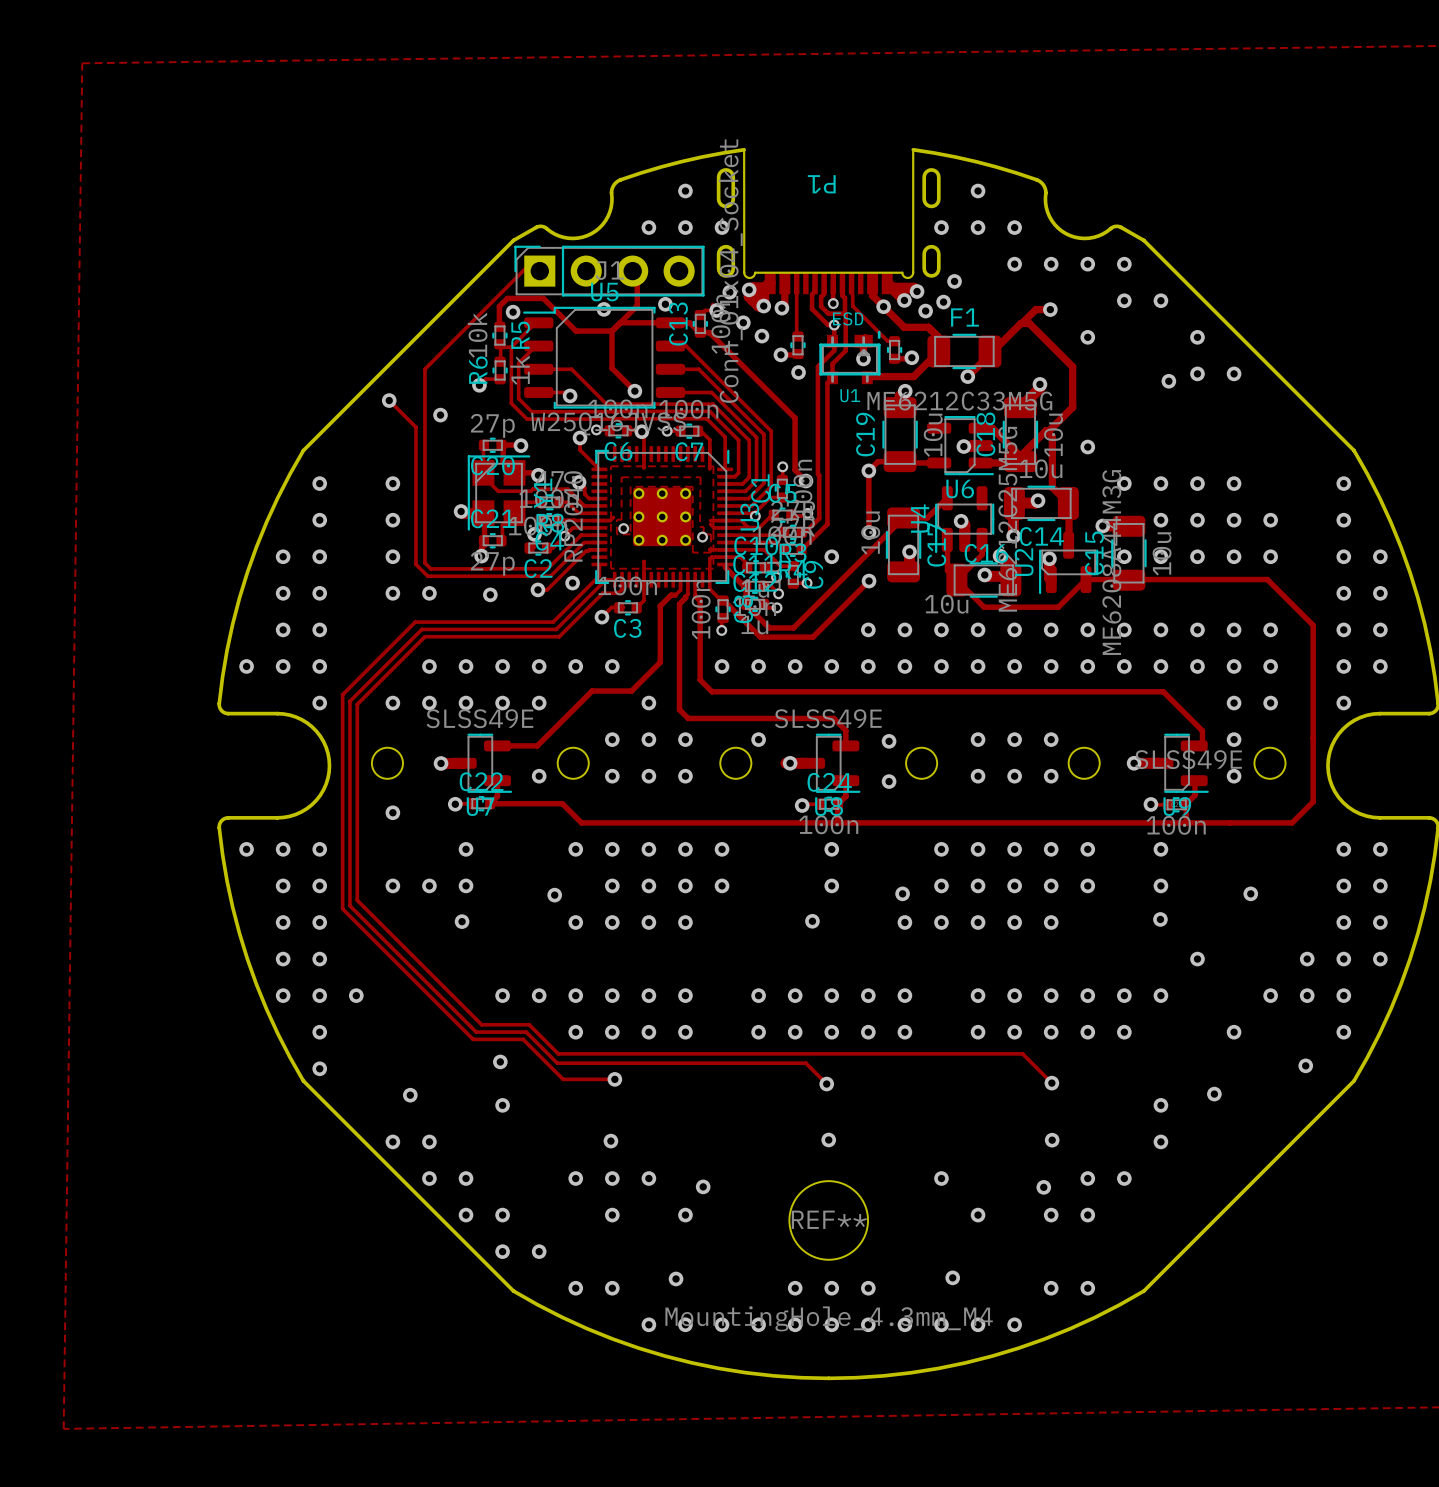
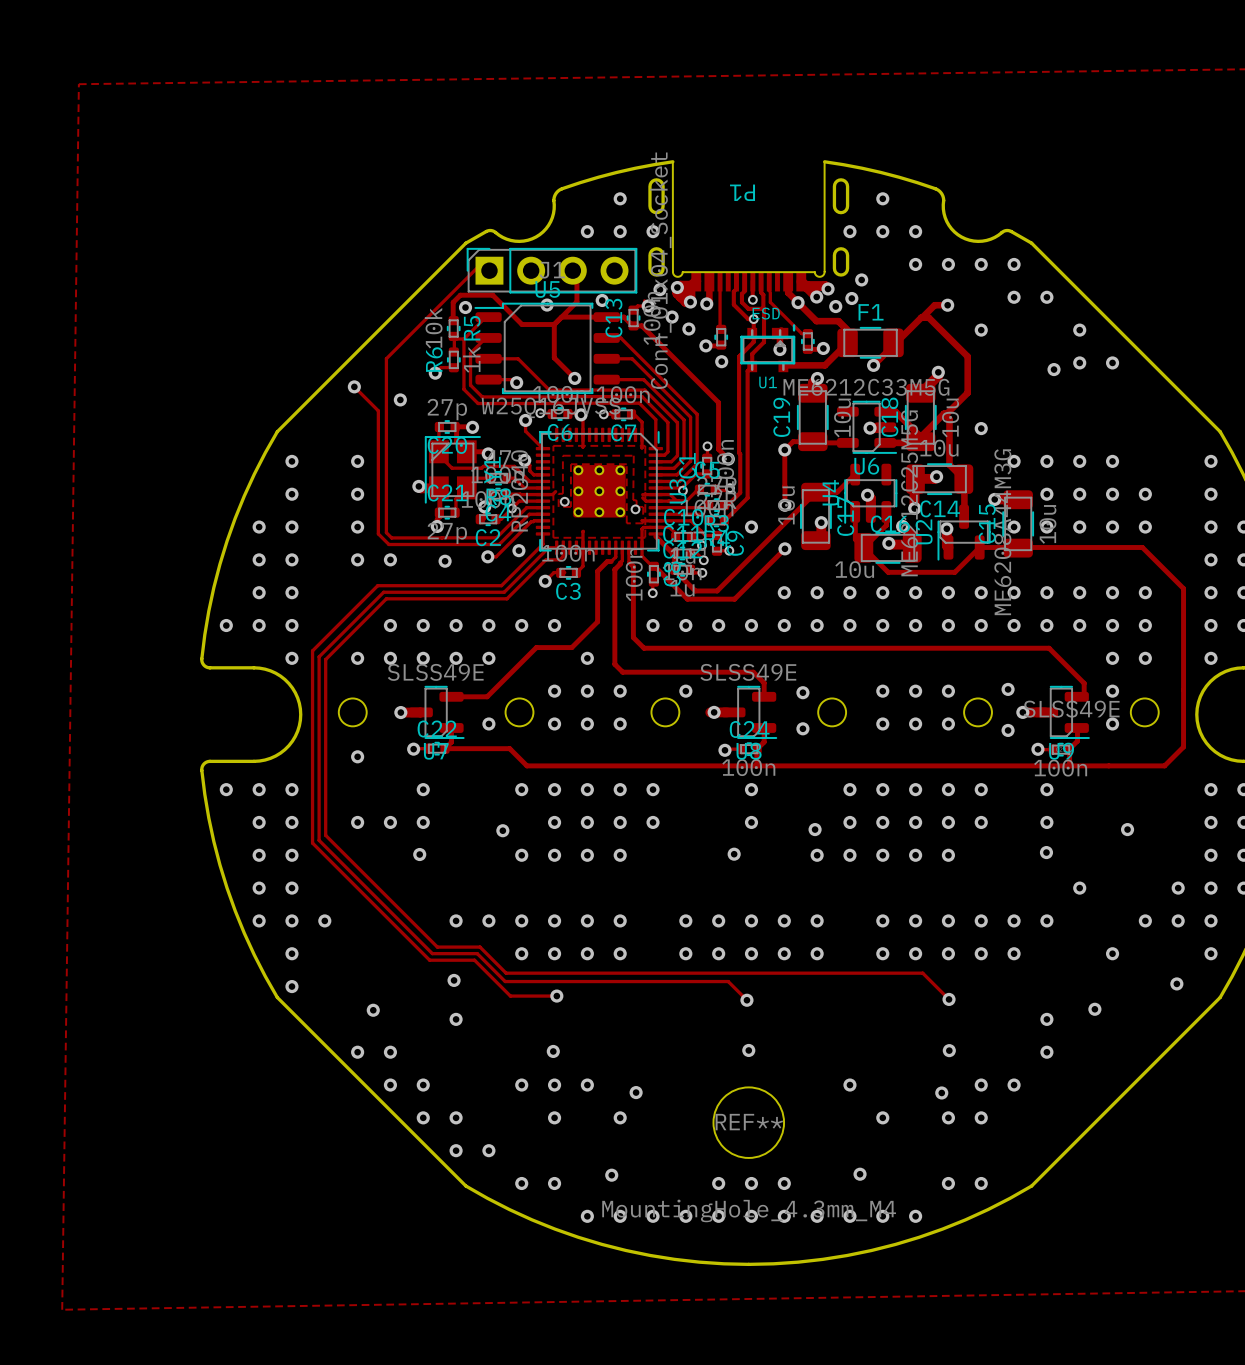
via: none -> (1008, 689)
via: none -> (1008, 730)

